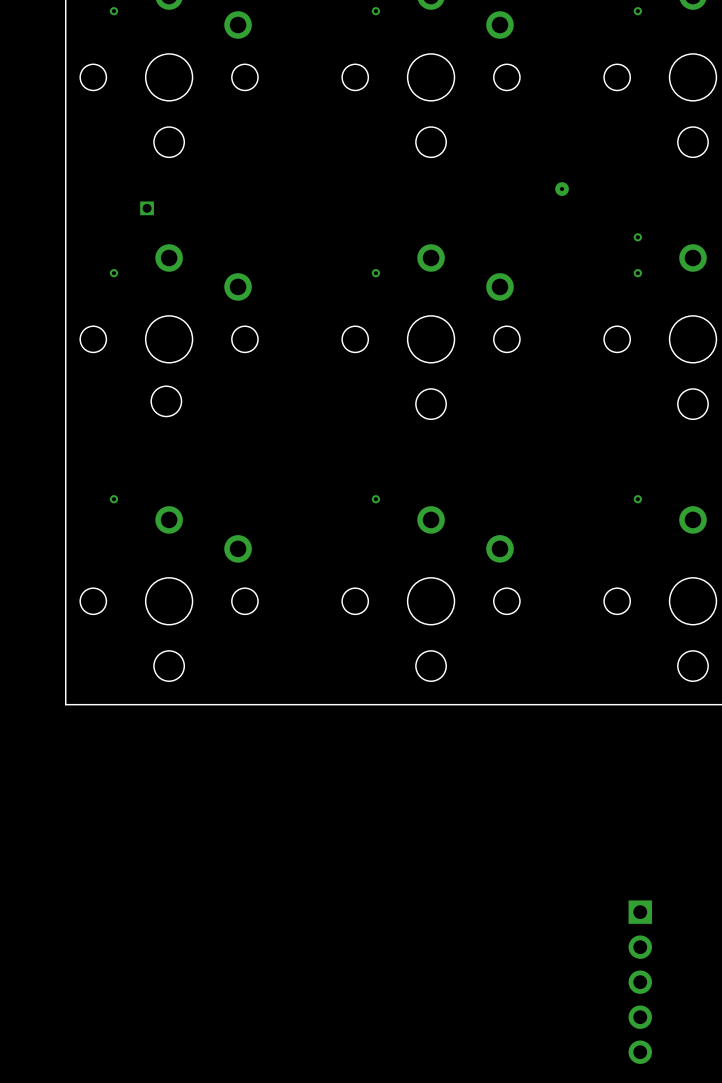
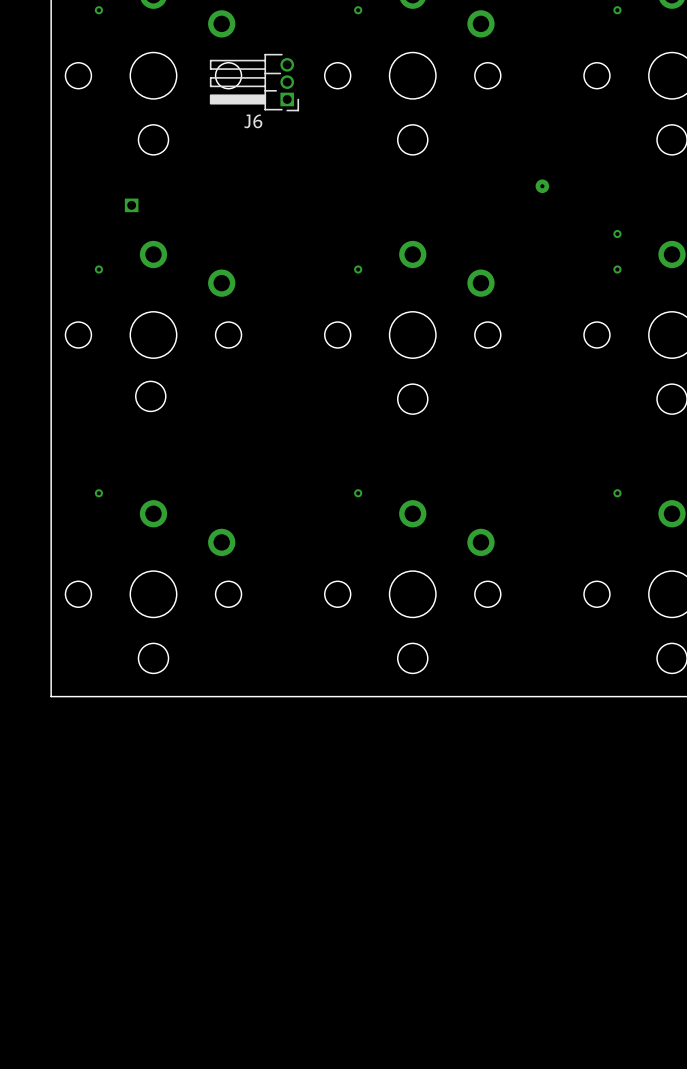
J6: none -> (254, 82)
part: (640, 982) -> none

